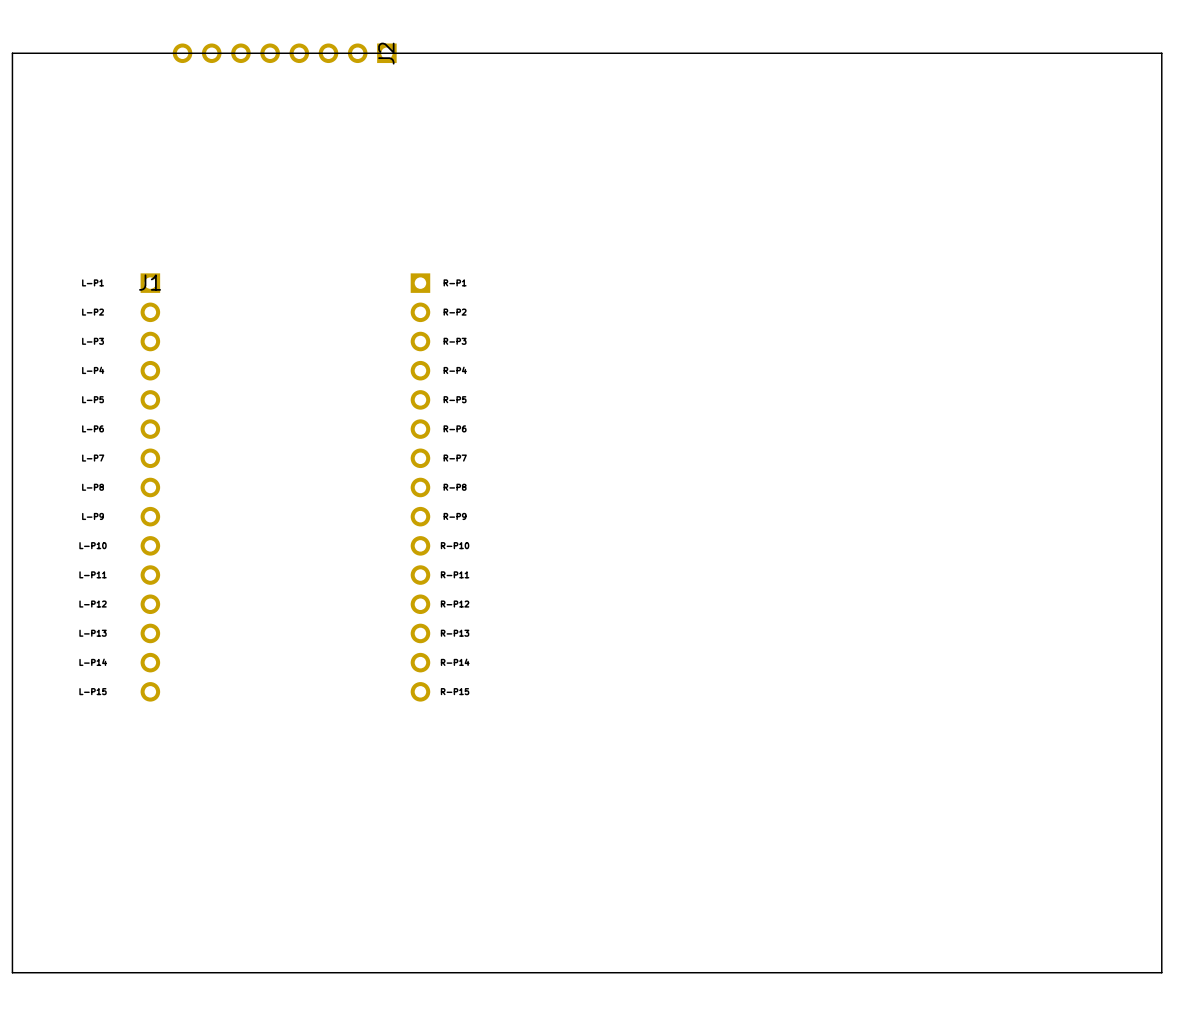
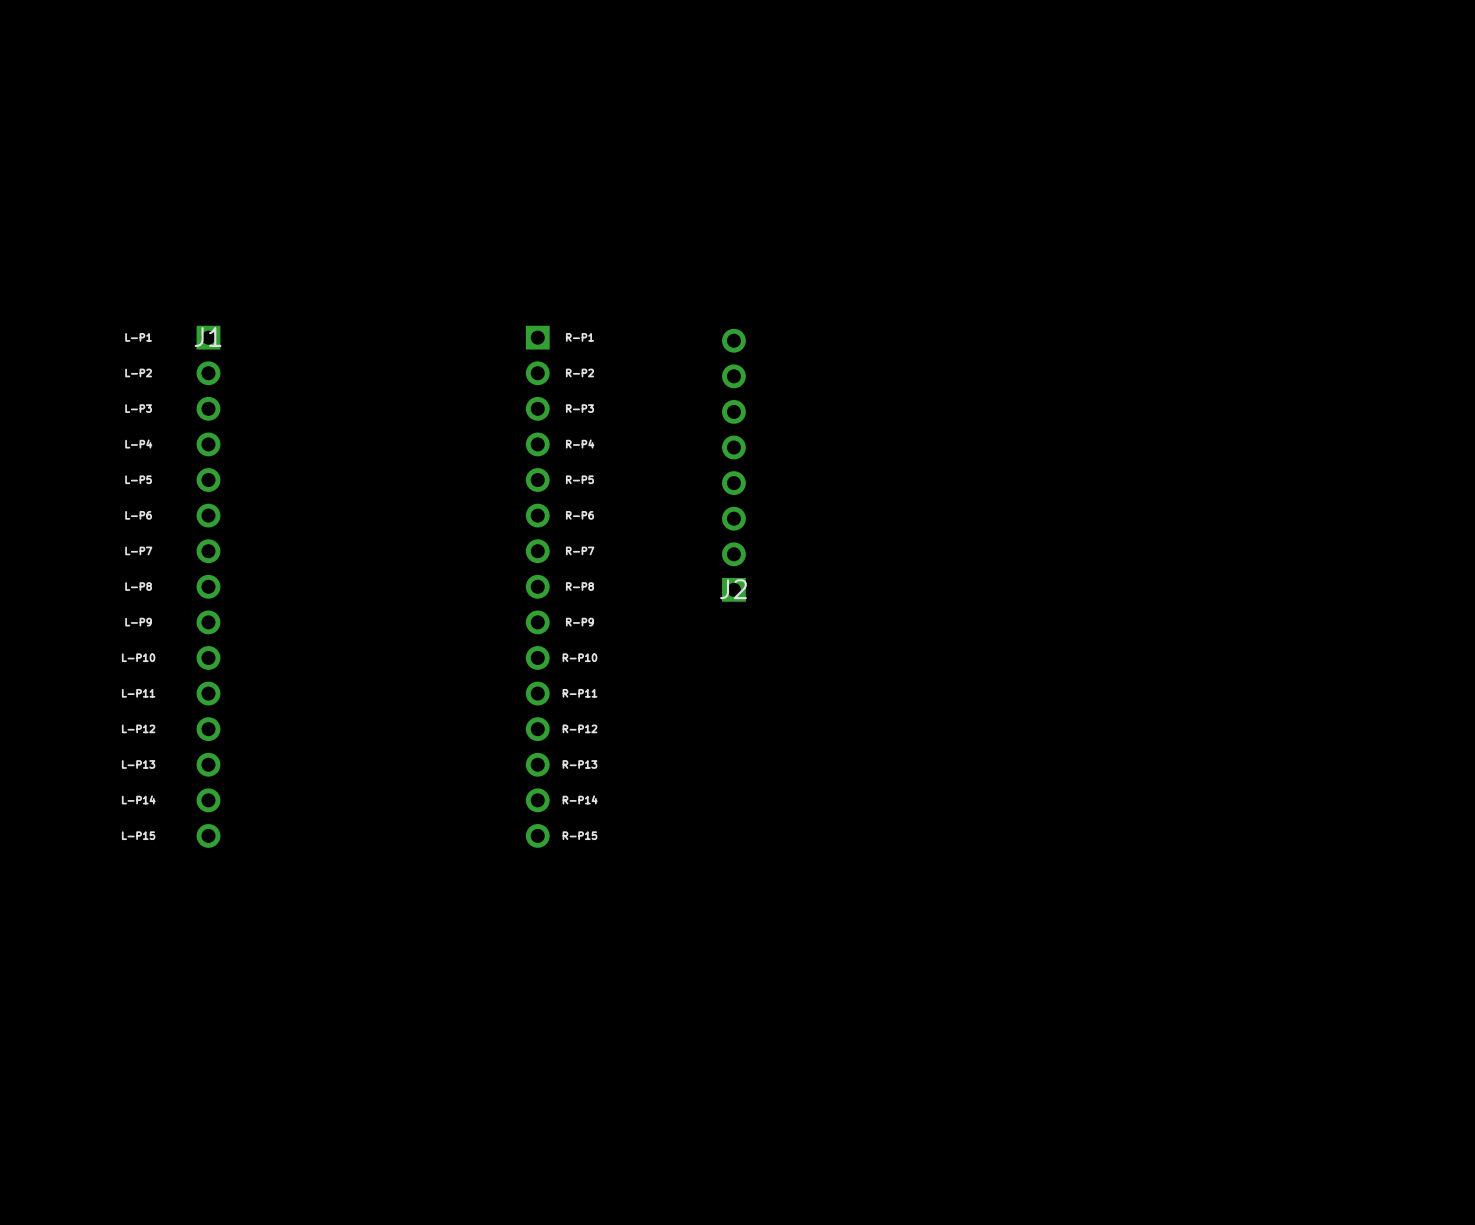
board edge: (12, 53) (1161, 53) (1161, 972) (12, 972) (12, 53) -> none
J2 rotation: 0° (284, 53) -> 90° clockwise (733, 465)
J2 position: (284, 53) -> (733, 465)

